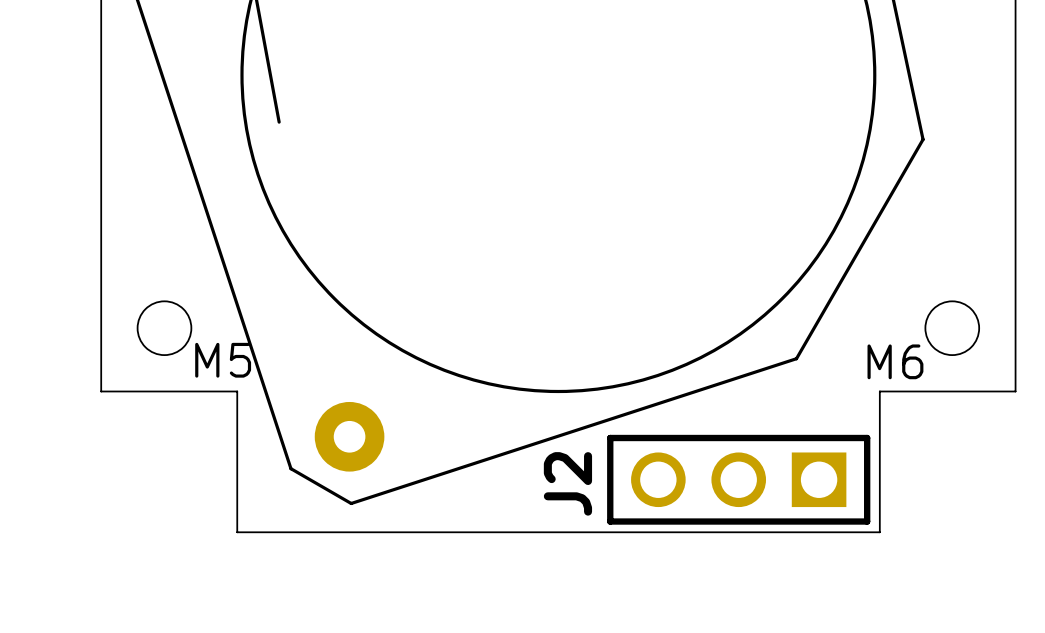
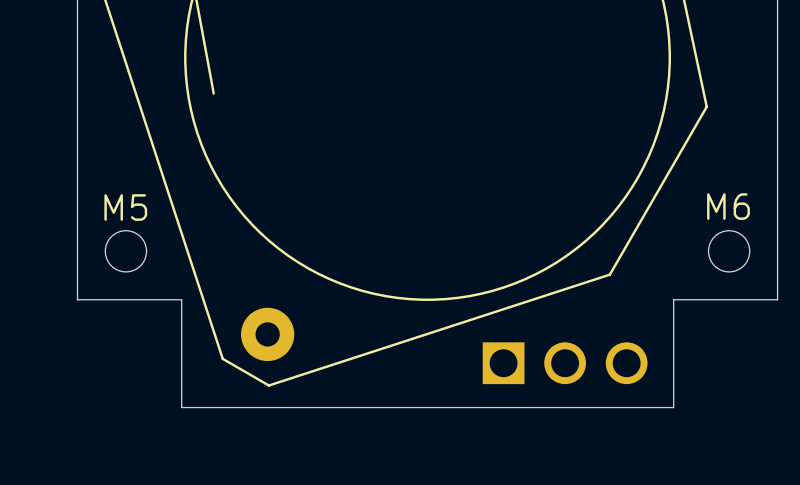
M5 name position: M5 (223, 360) -> M5 (125, 207)
M6 name position: M6 (895, 361) -> M6 (728, 206)
J2 side: top (738, 479) -> bottom (565, 363)

